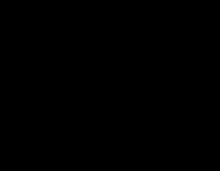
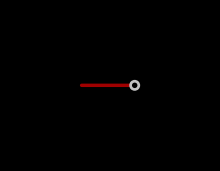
top track: none -> (81, 85) (138, 85)
via: none -> (134, 85)

